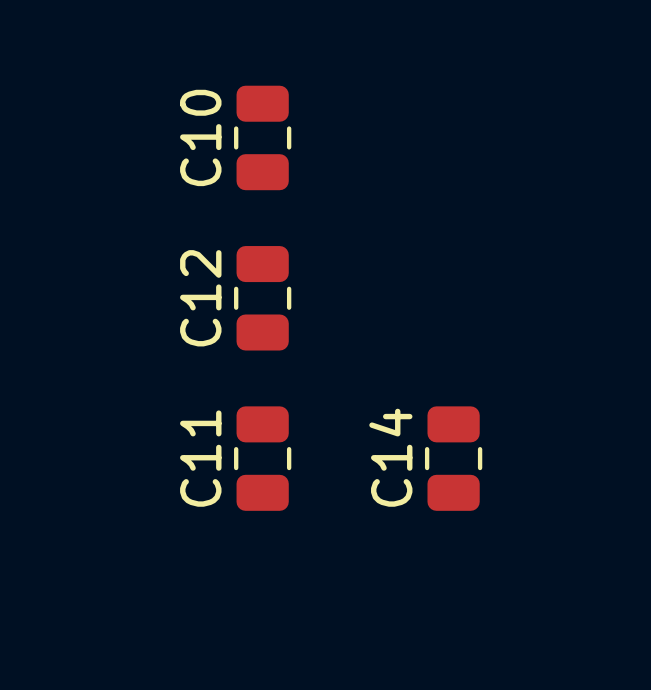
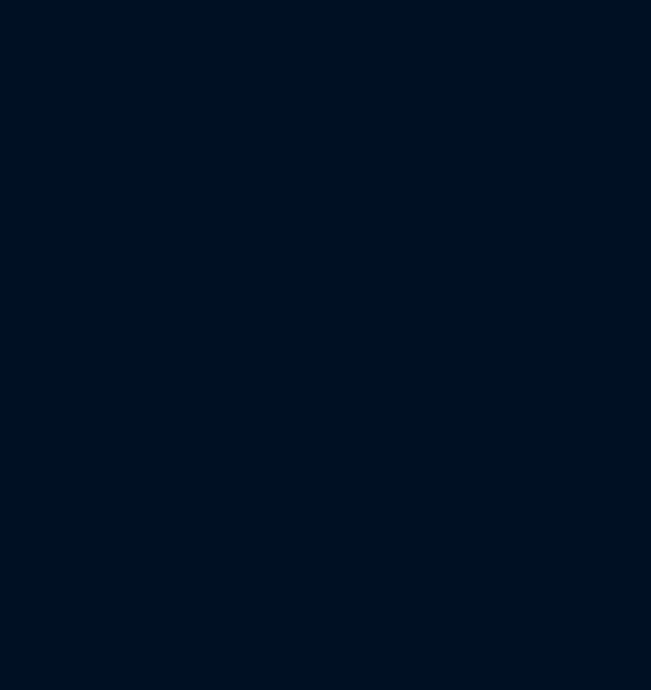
C10: (262, 137) -> none
C12: (262, 298) -> none
C11: (262, 458) -> none
C14: (453, 458) -> none

